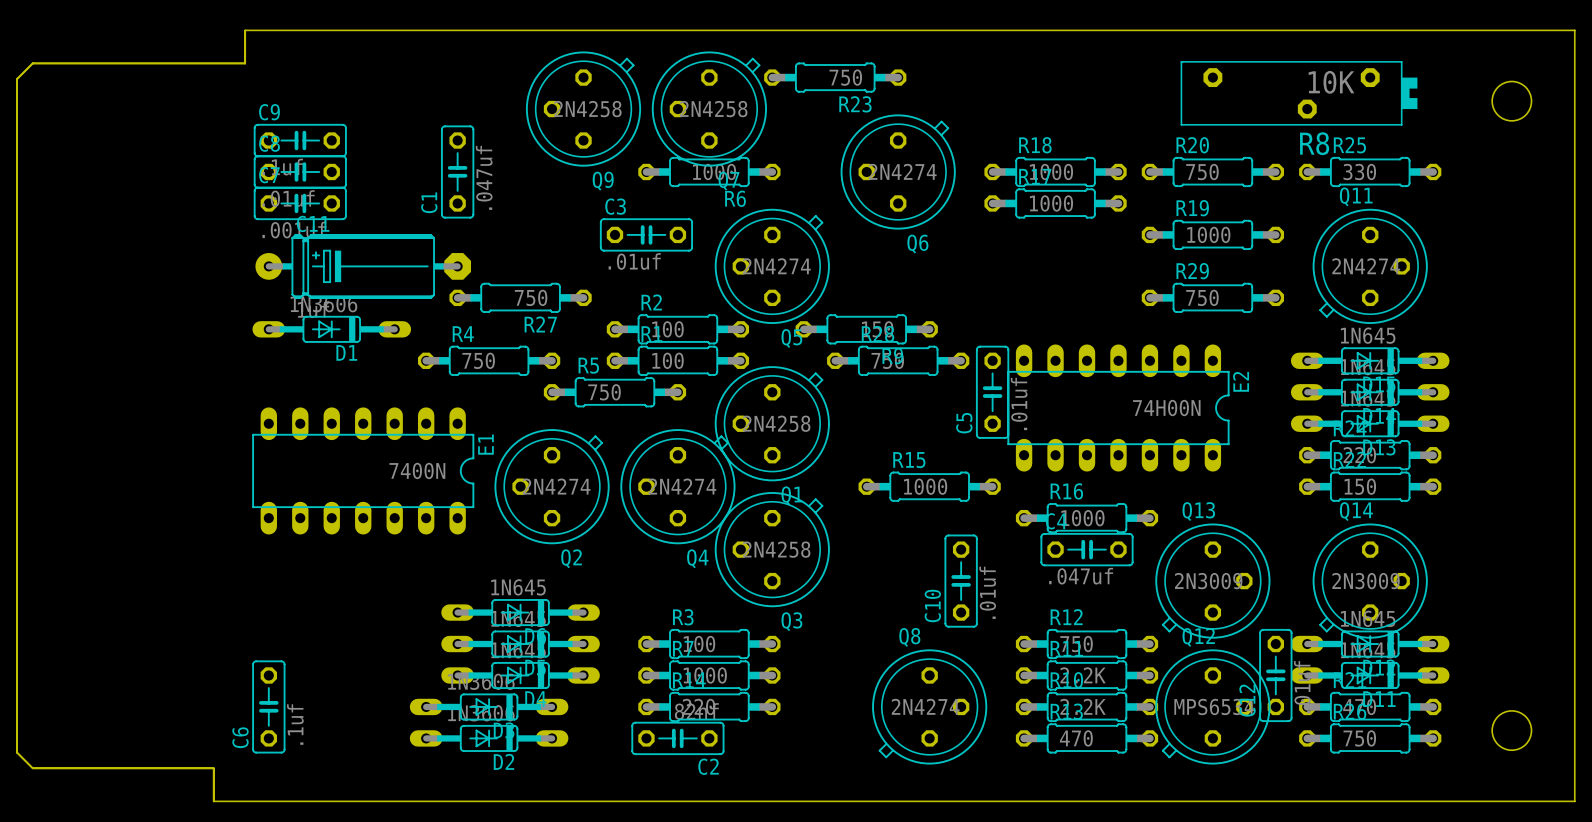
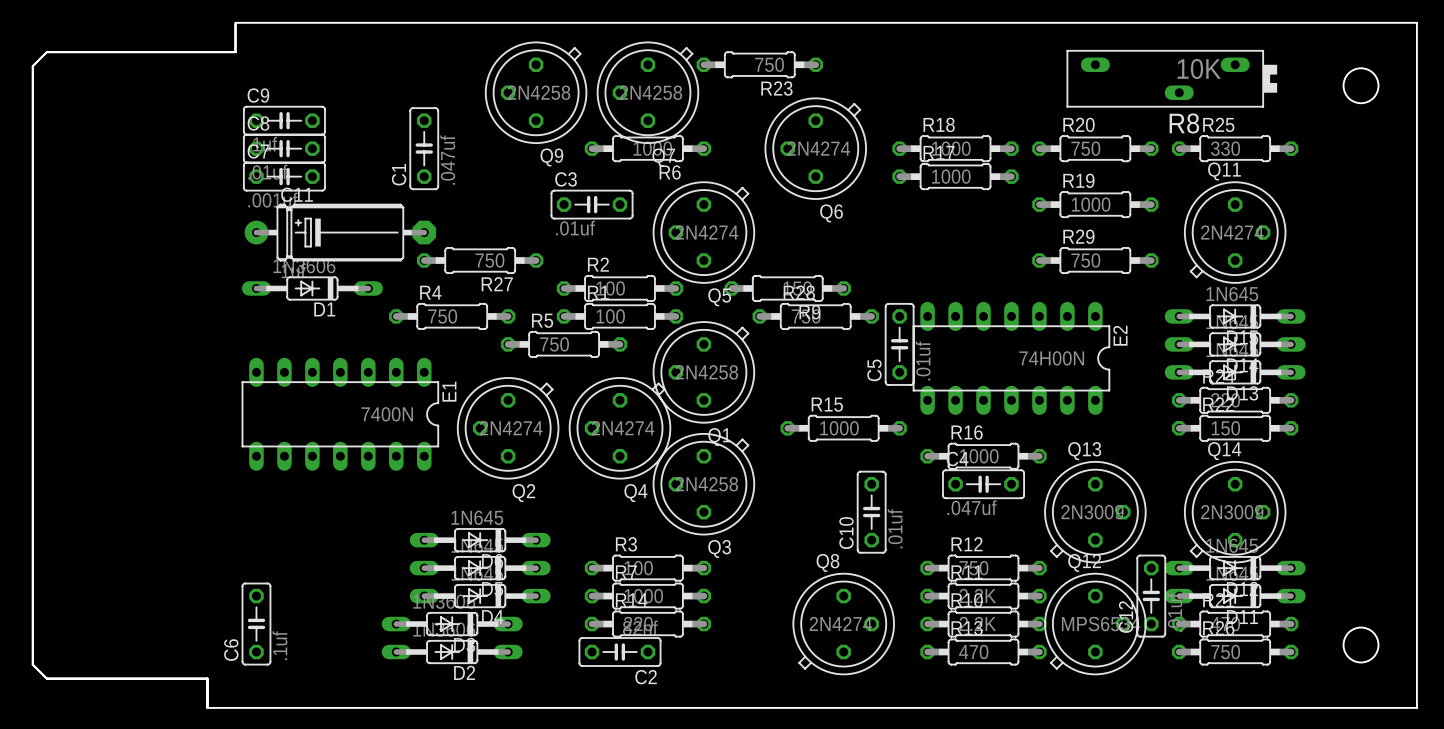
R8 footprint: [1180, 61, 1418, 126] -> [1066, 49, 1278, 108]

